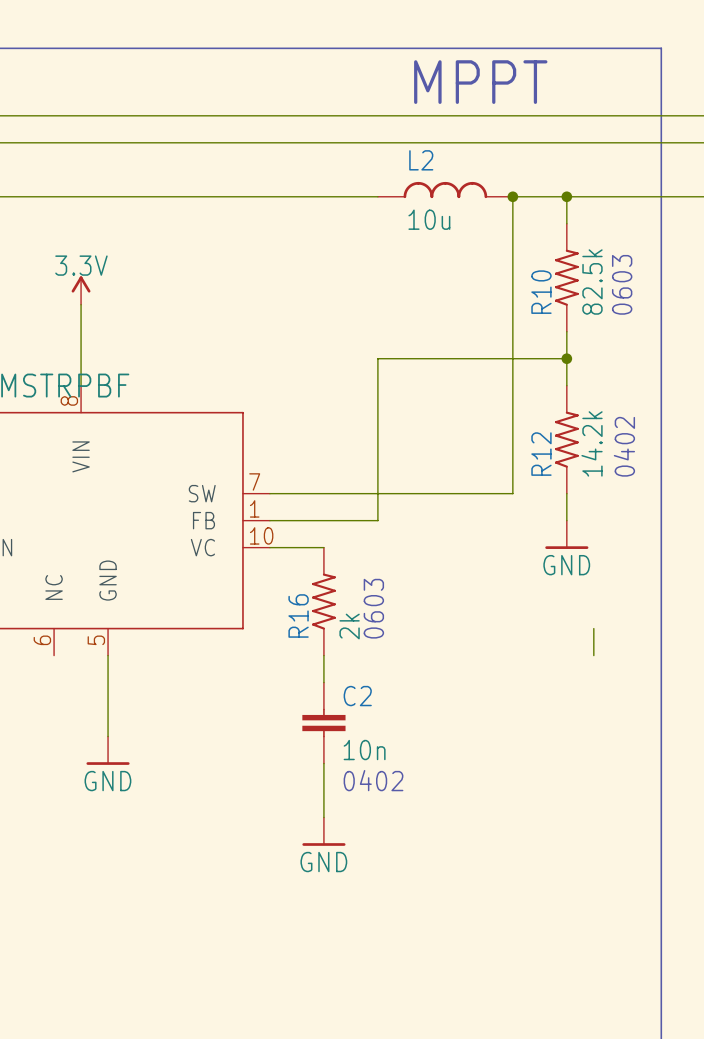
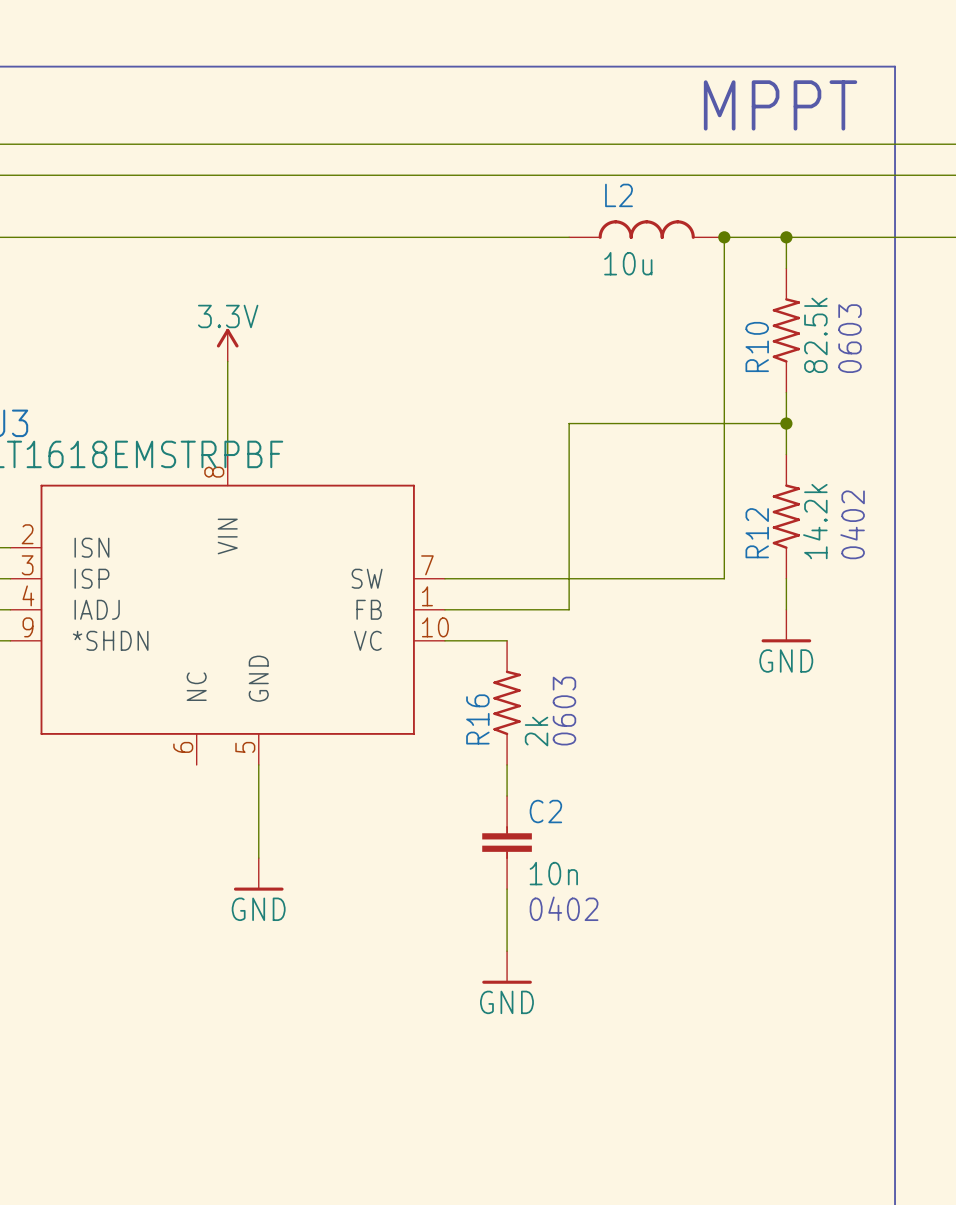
text position: MPPT (480, 82) -> MPPT (780, 105)
wire: (593, 628) (593, 655) -> none

